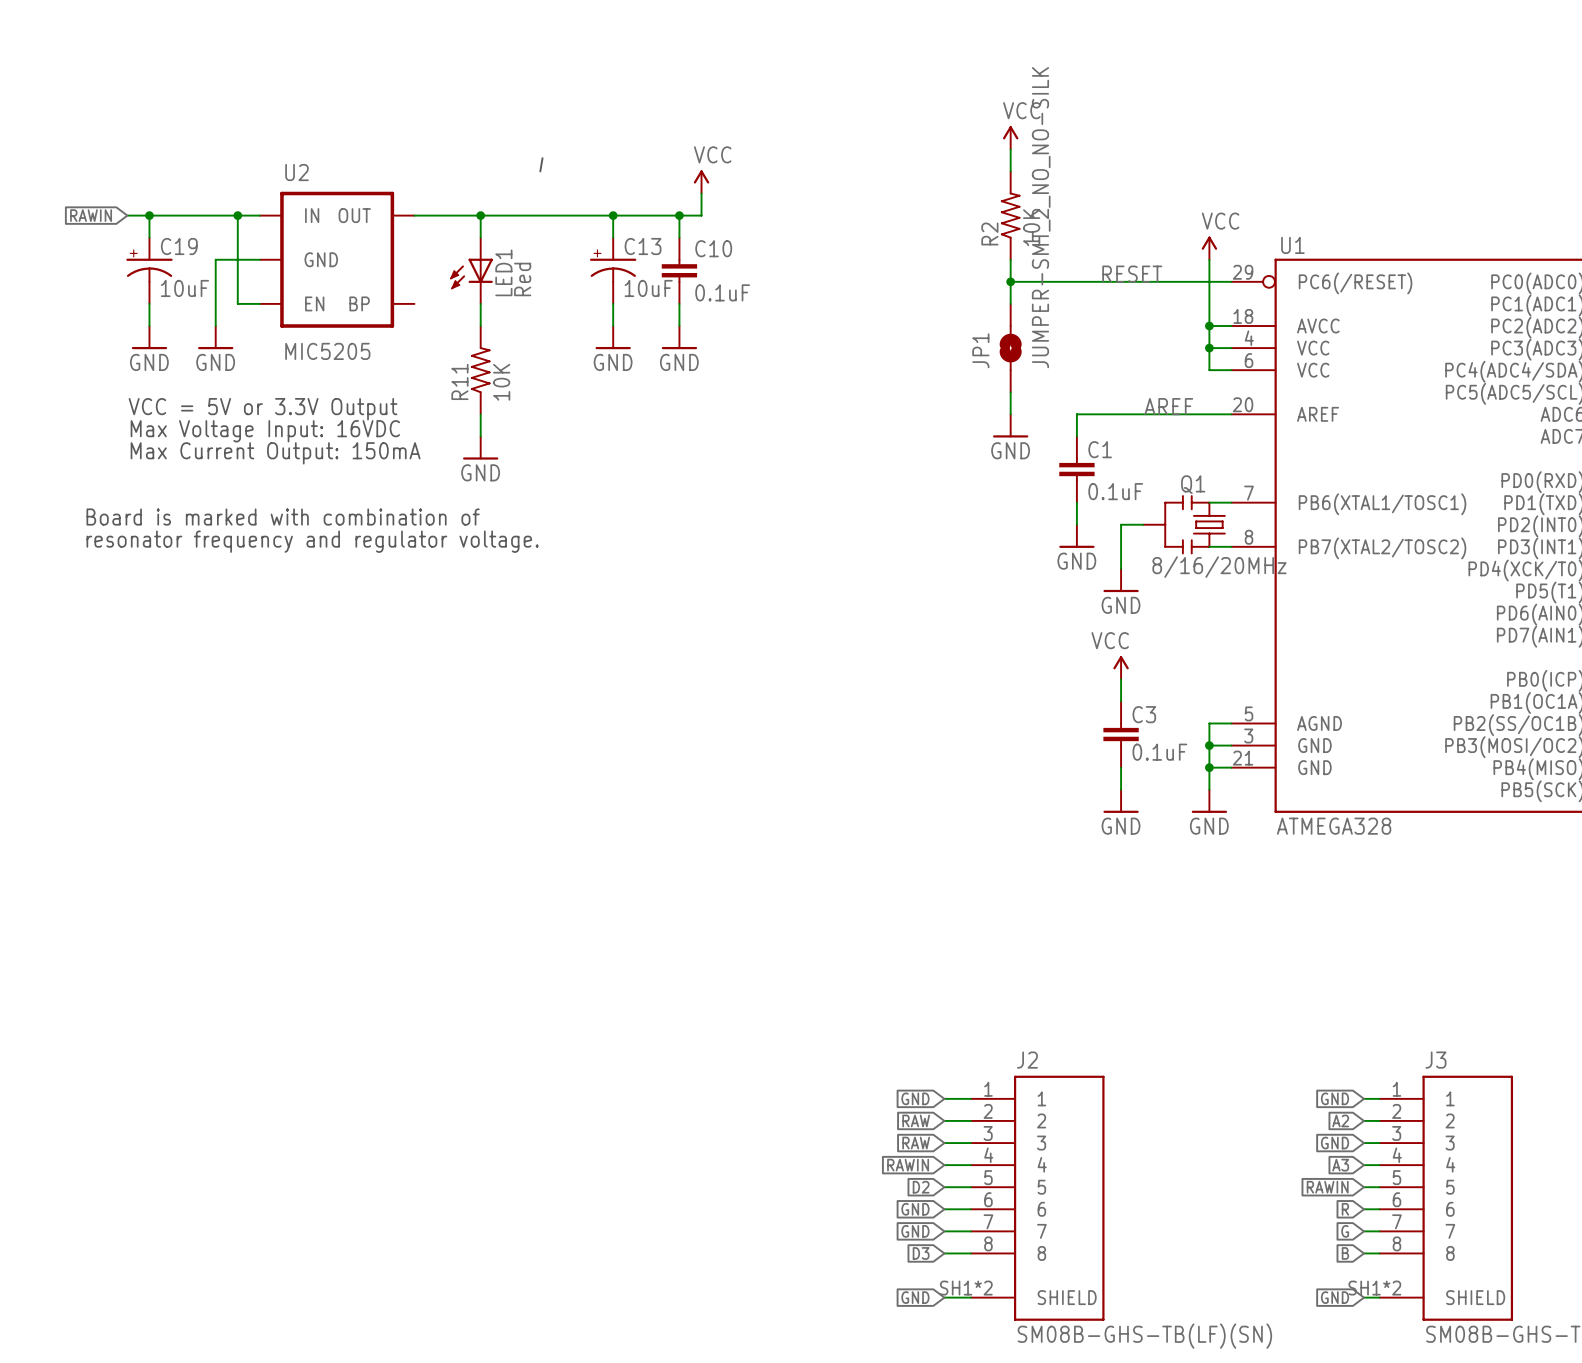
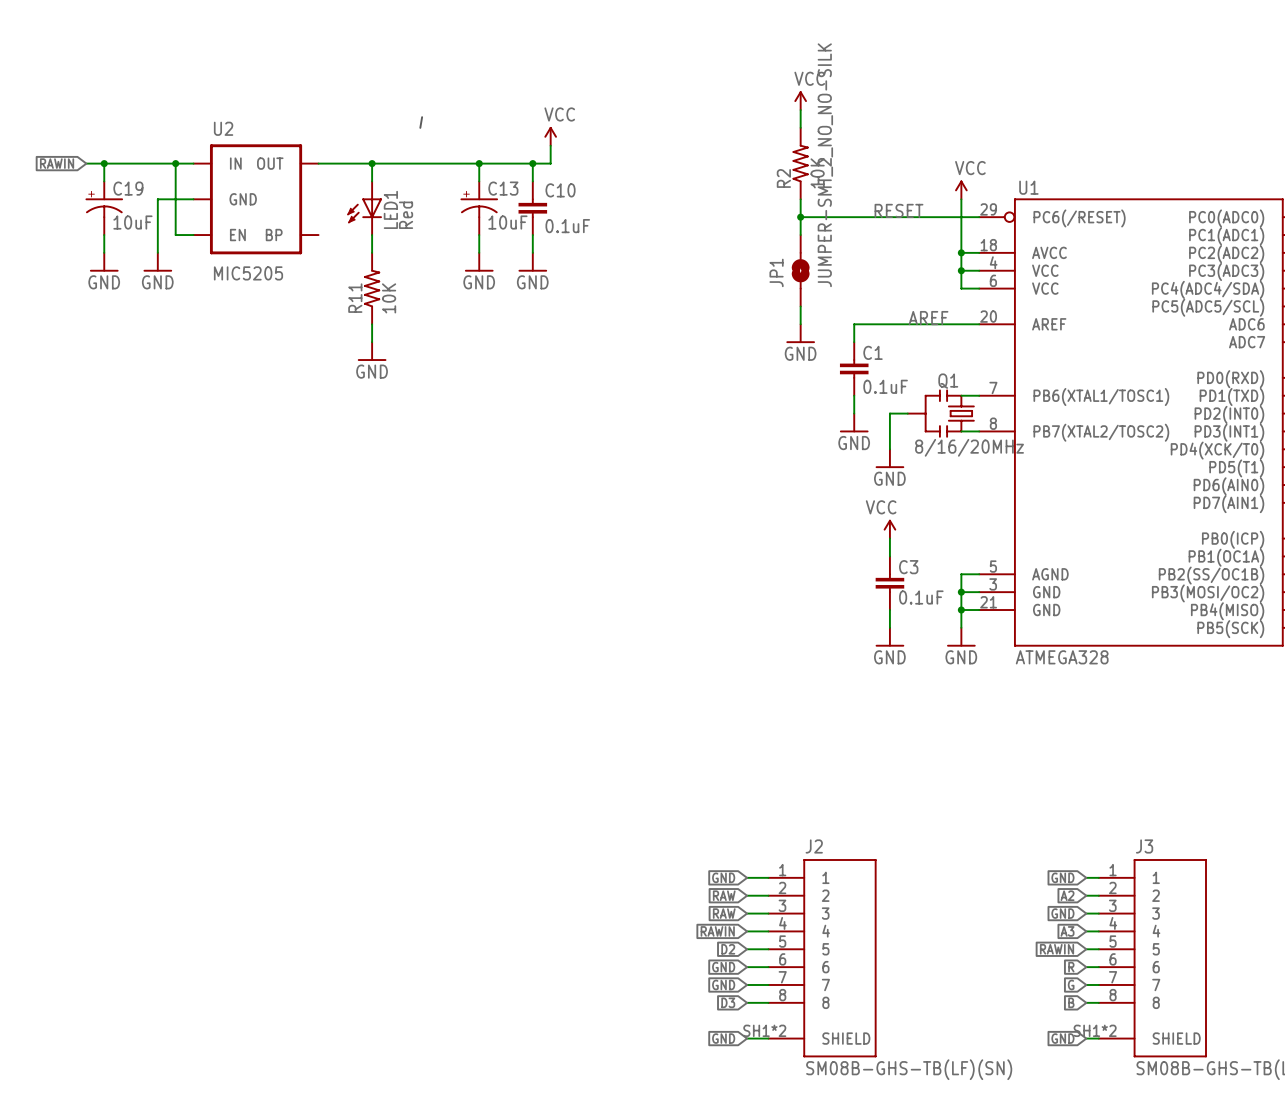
text: VCC = 5V or 3.3V Output (263, 409) -> none
text: Max Voltage Input: 16VDC (265, 431) -> none
text: Max Current Output: 150mA (275, 453) -> none
text: Board is marked with combination of (283, 517) -> none
text: resonator frequency and regulator voltage. (312, 541) -> none

